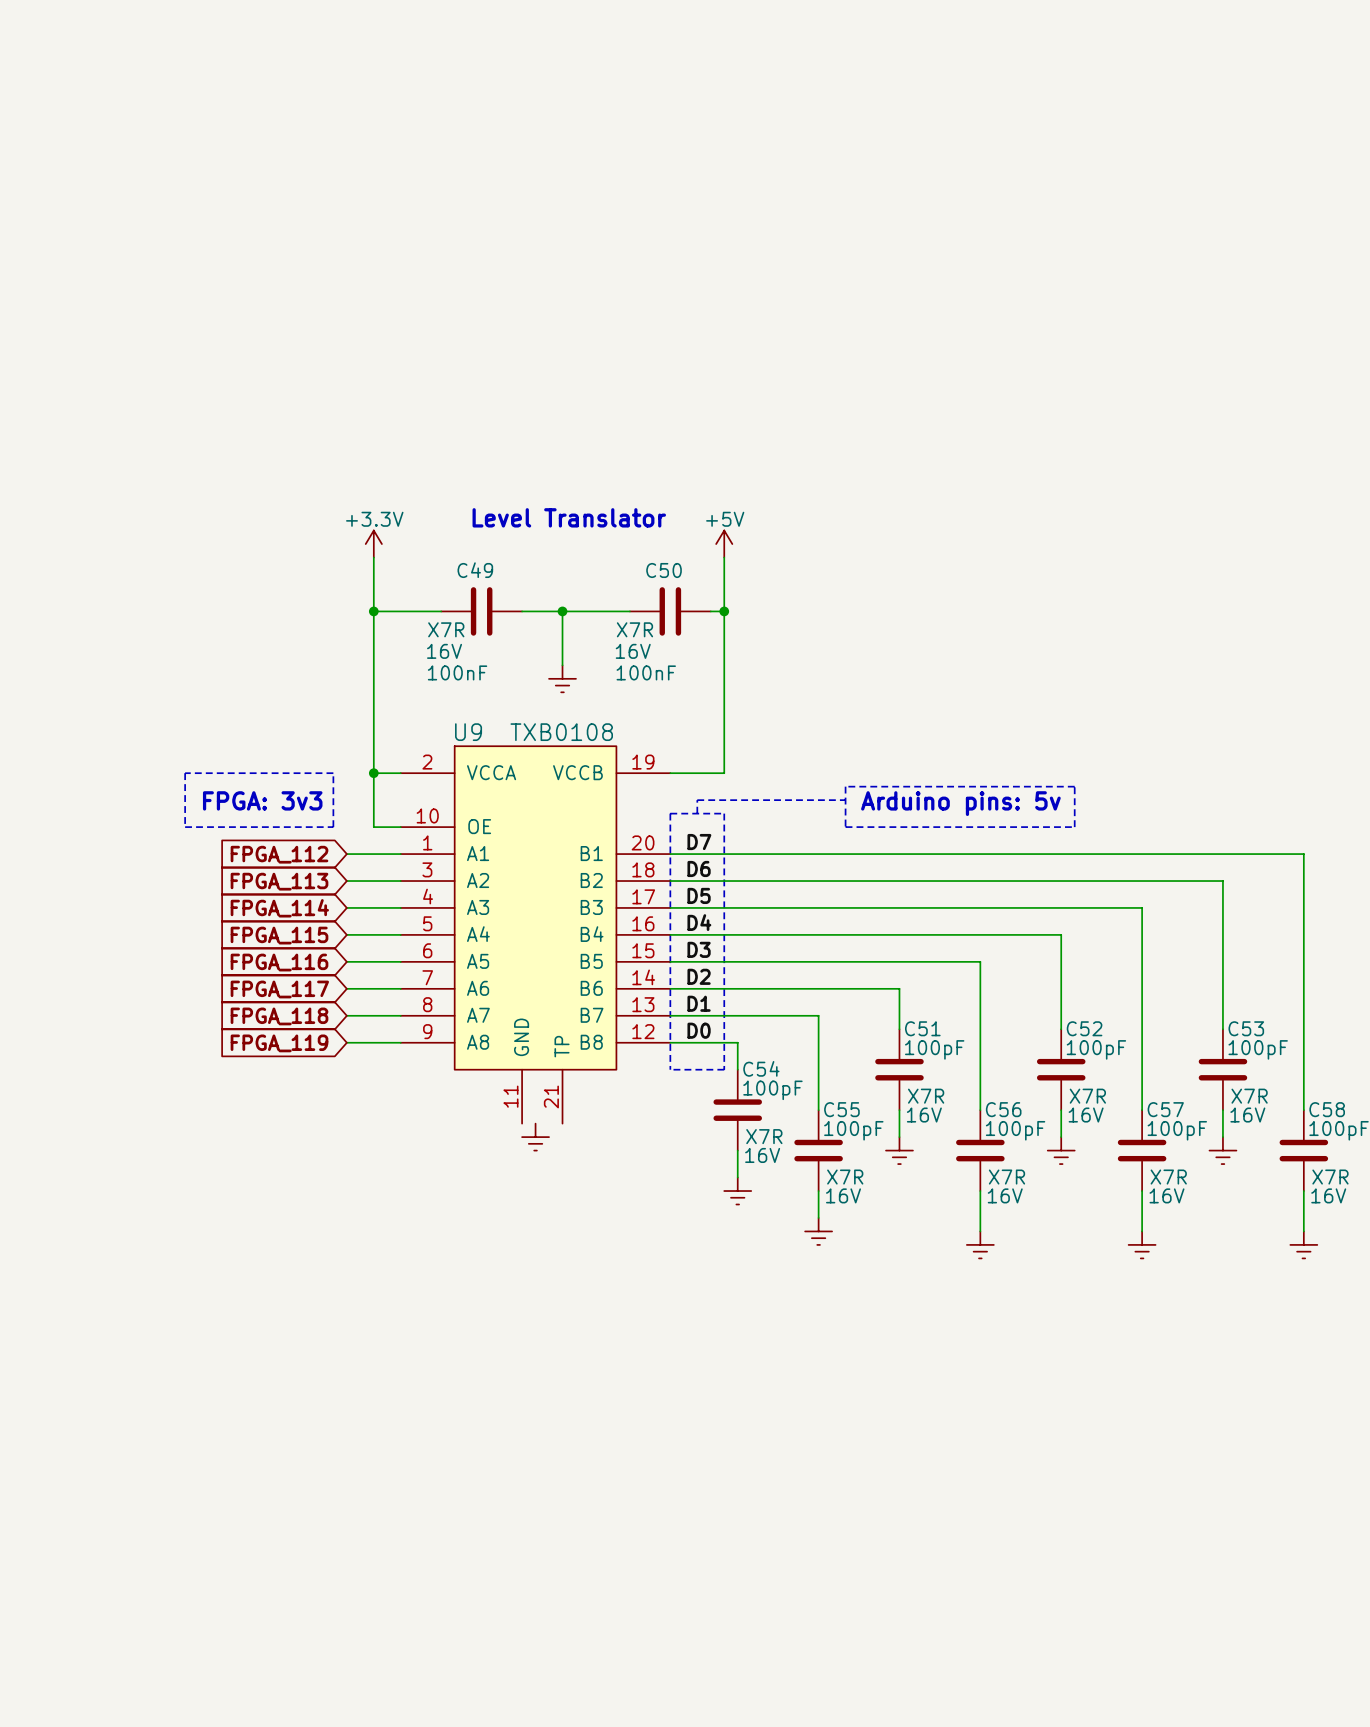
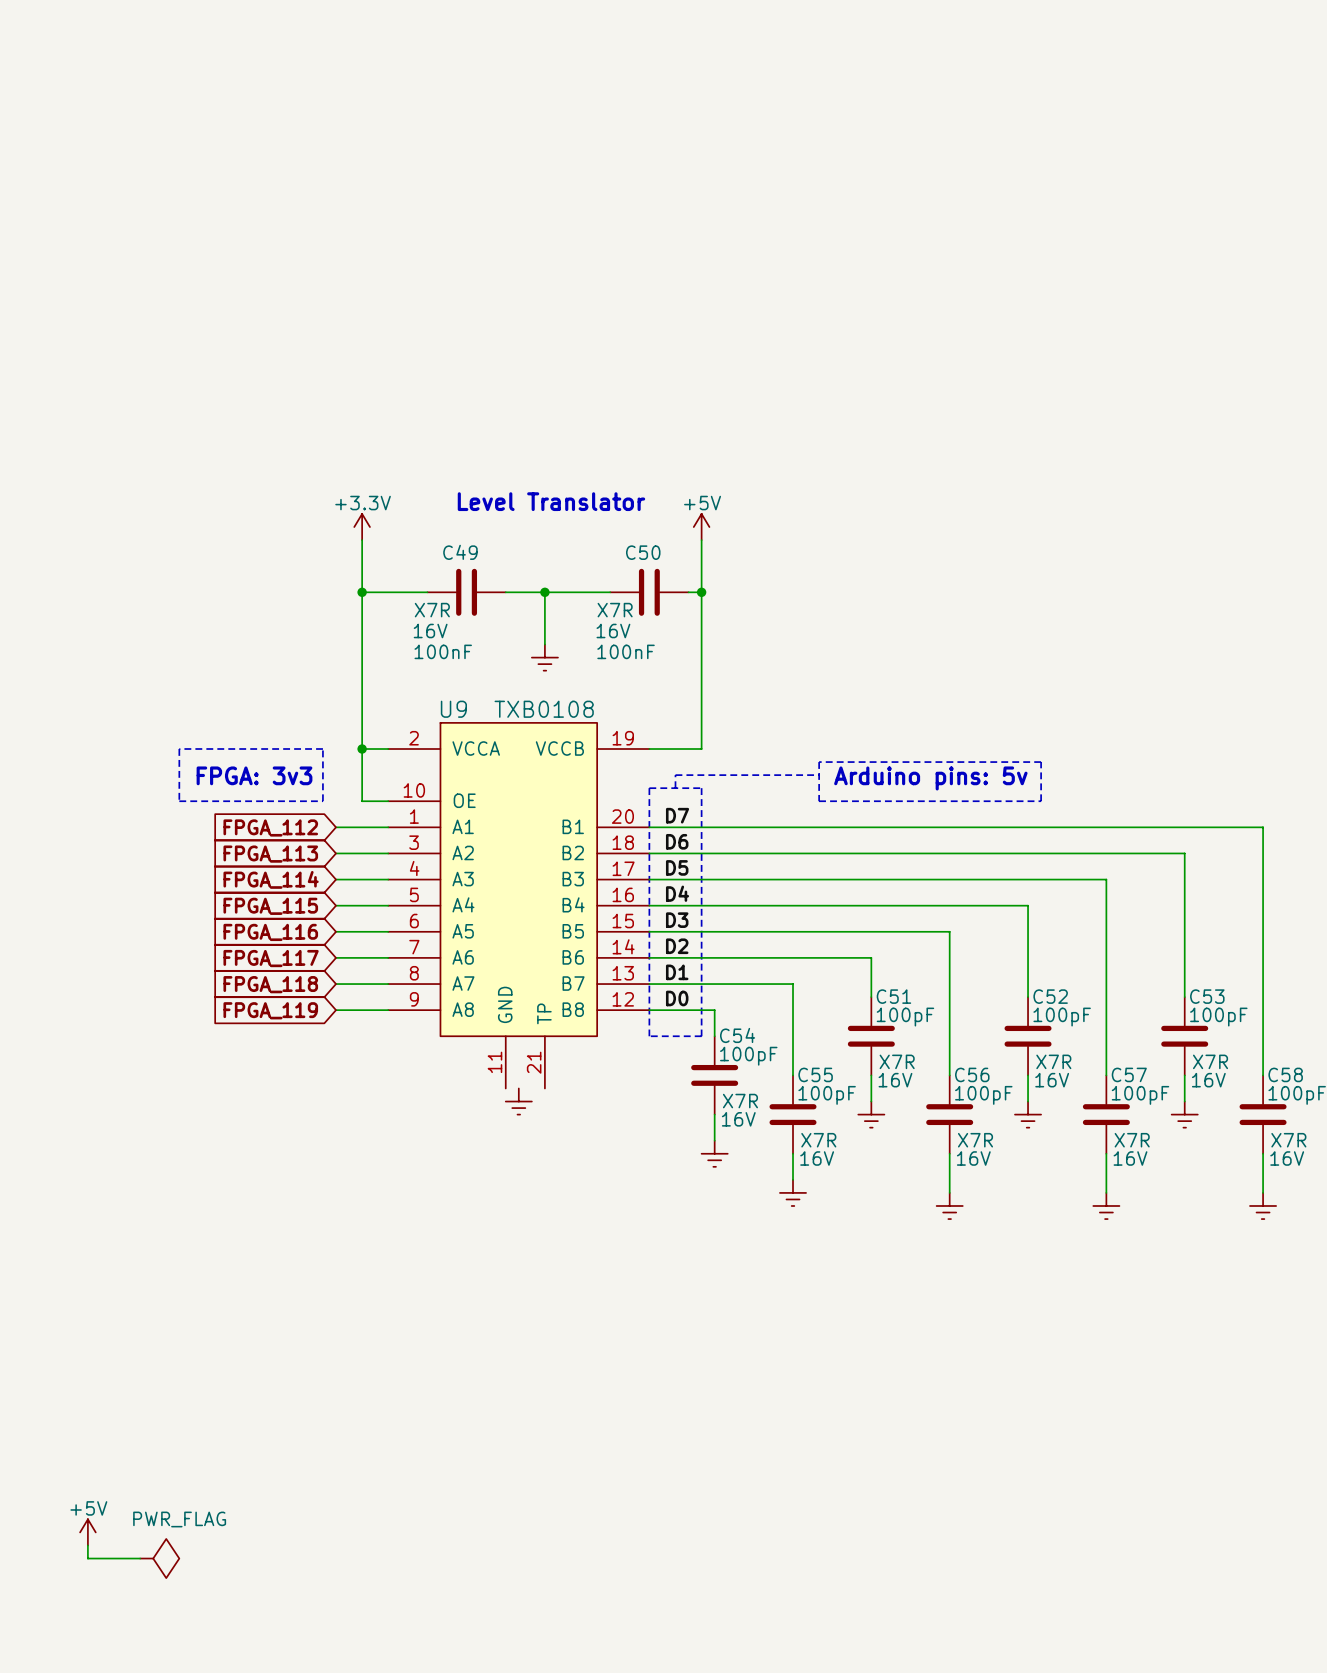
power symbol: none -> +5V (87, 1532)
wire: none -> (87, 1545) (87, 1558) (140, 1558)
power symbol: none -> PWR_FLAG (159, 1558)

